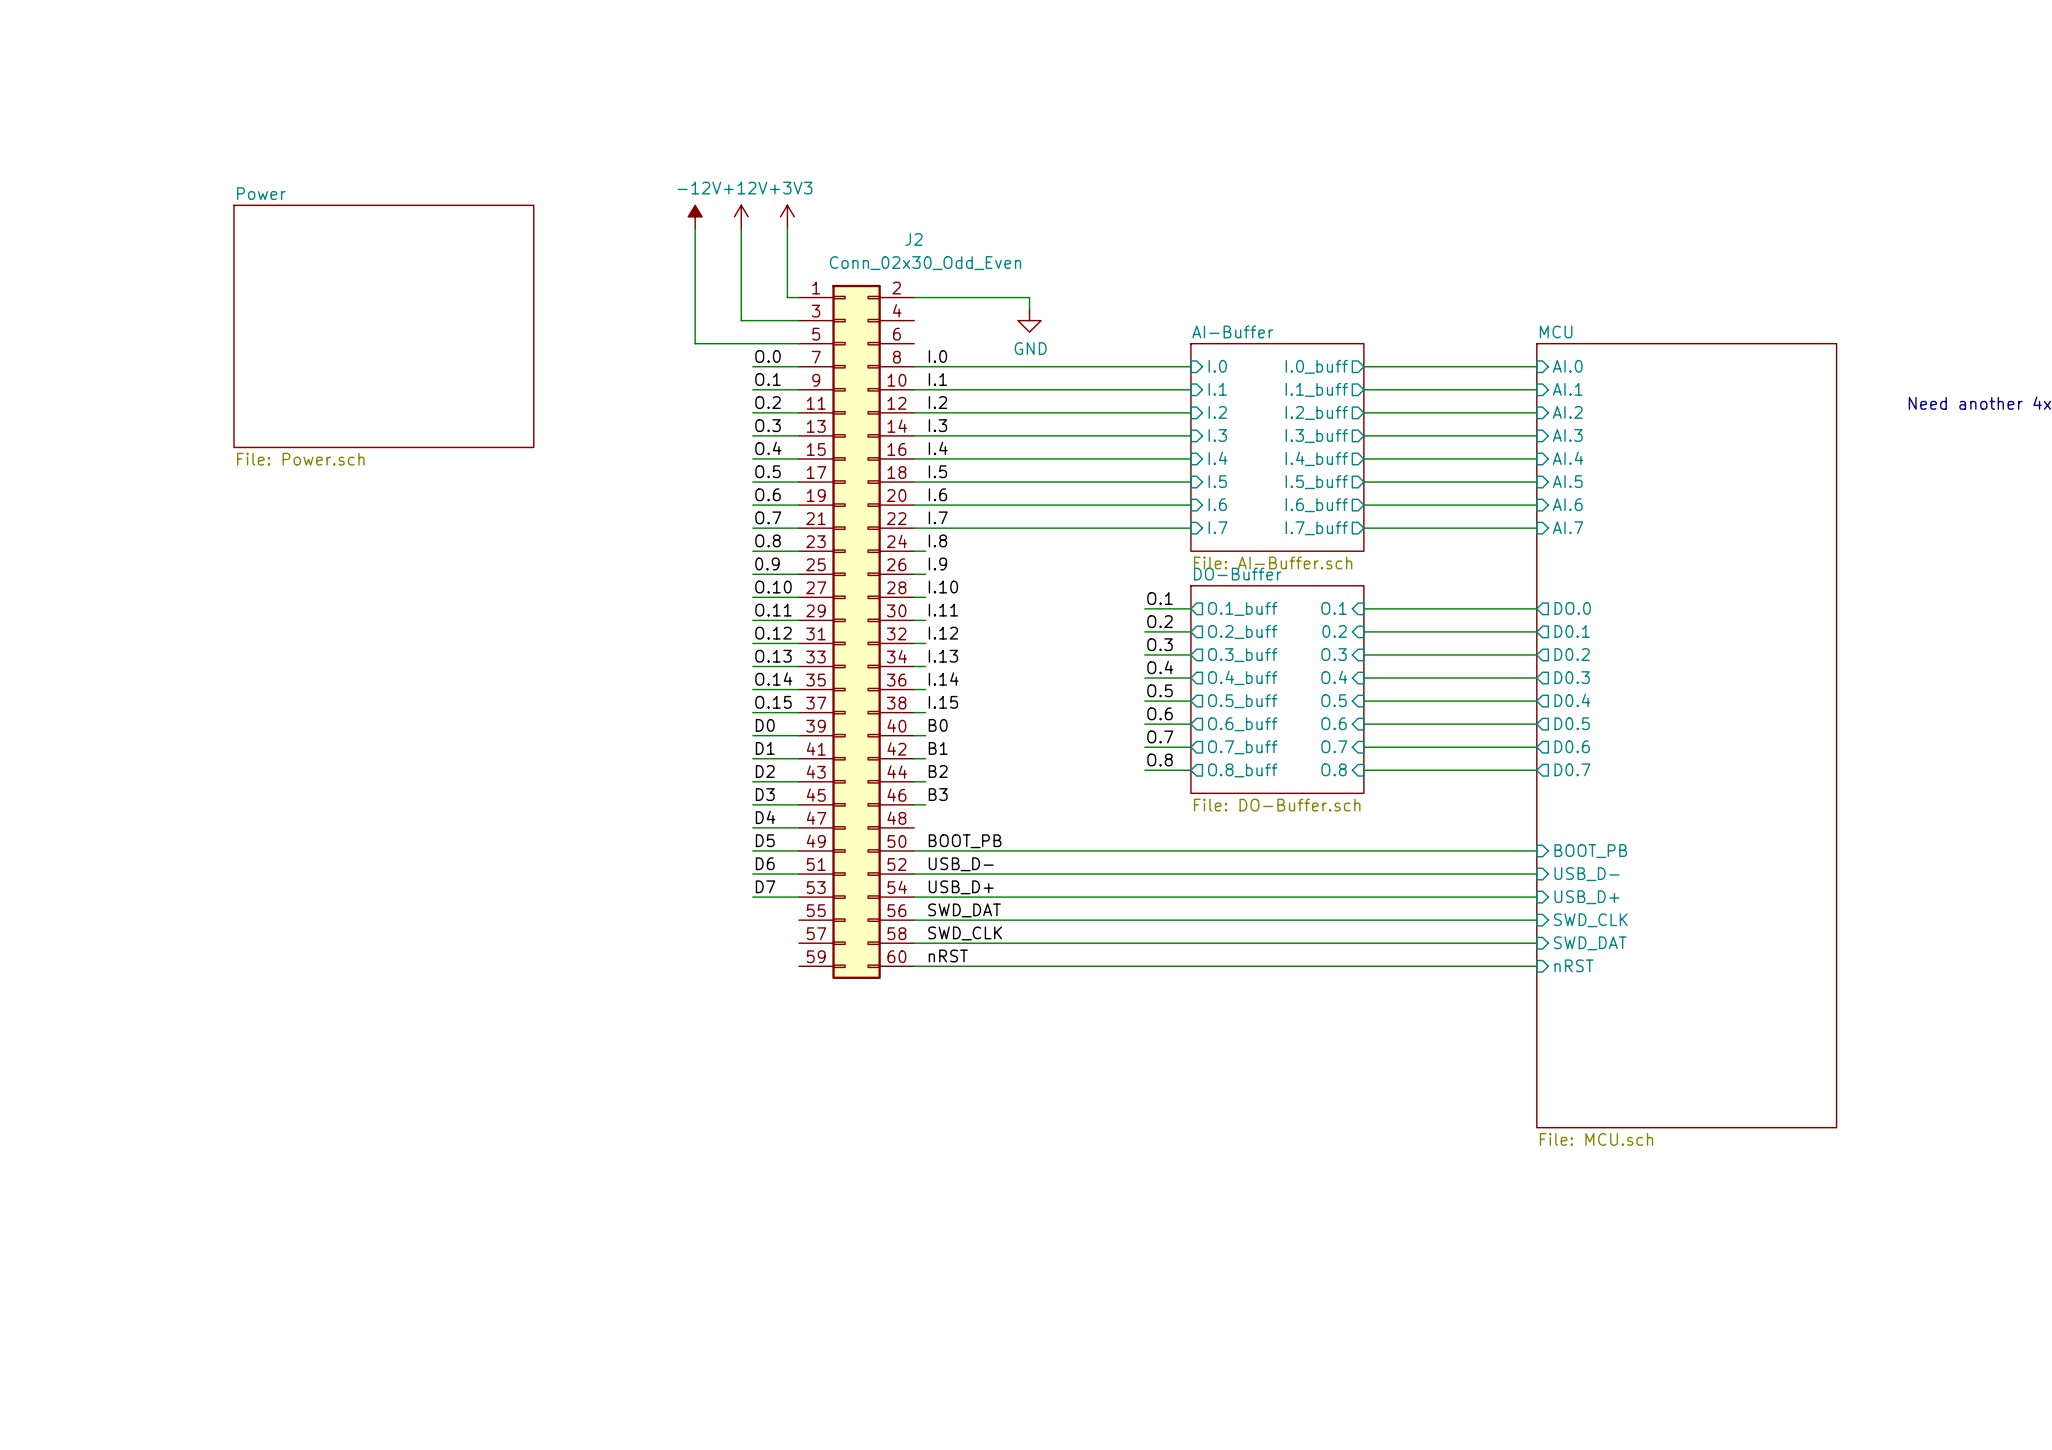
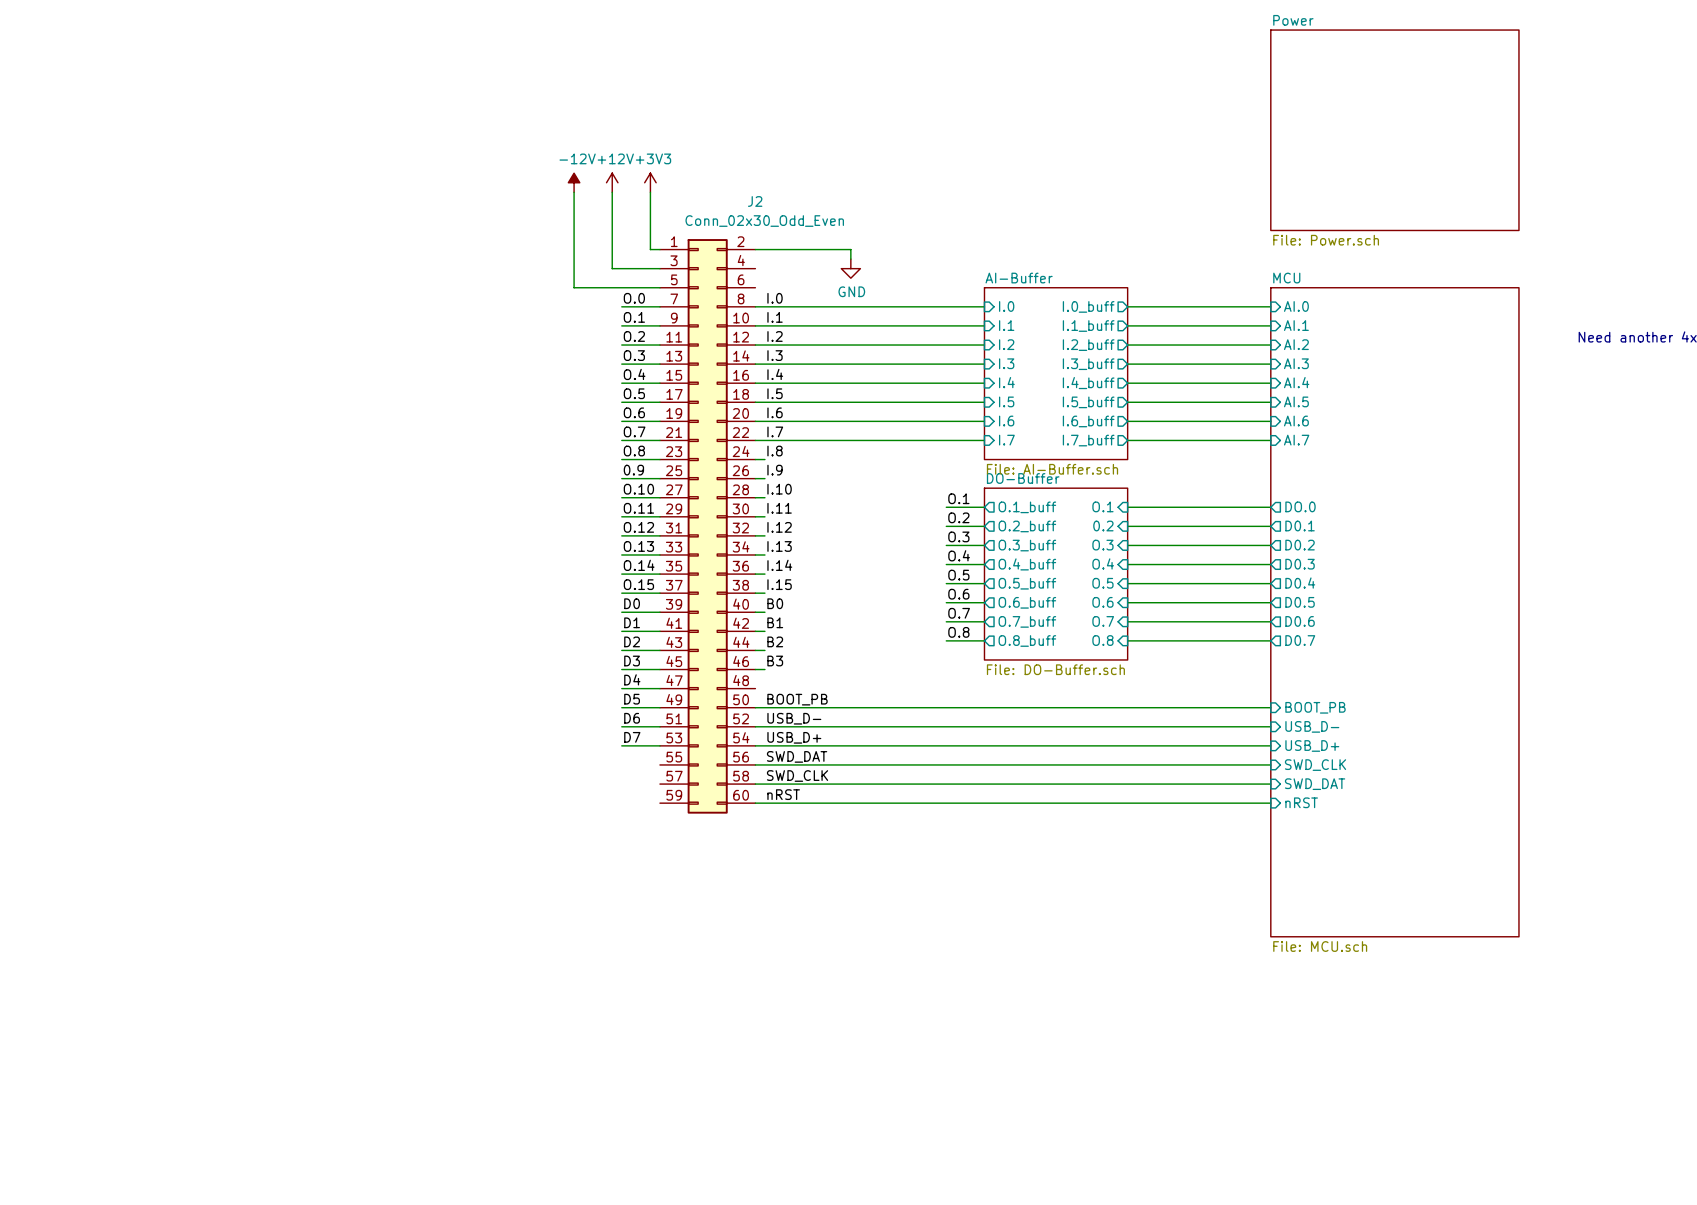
sheet Power: none -> File: Power.sch (1394, 130)
sheet Power: File: Power.sch (383, 326) -> none

